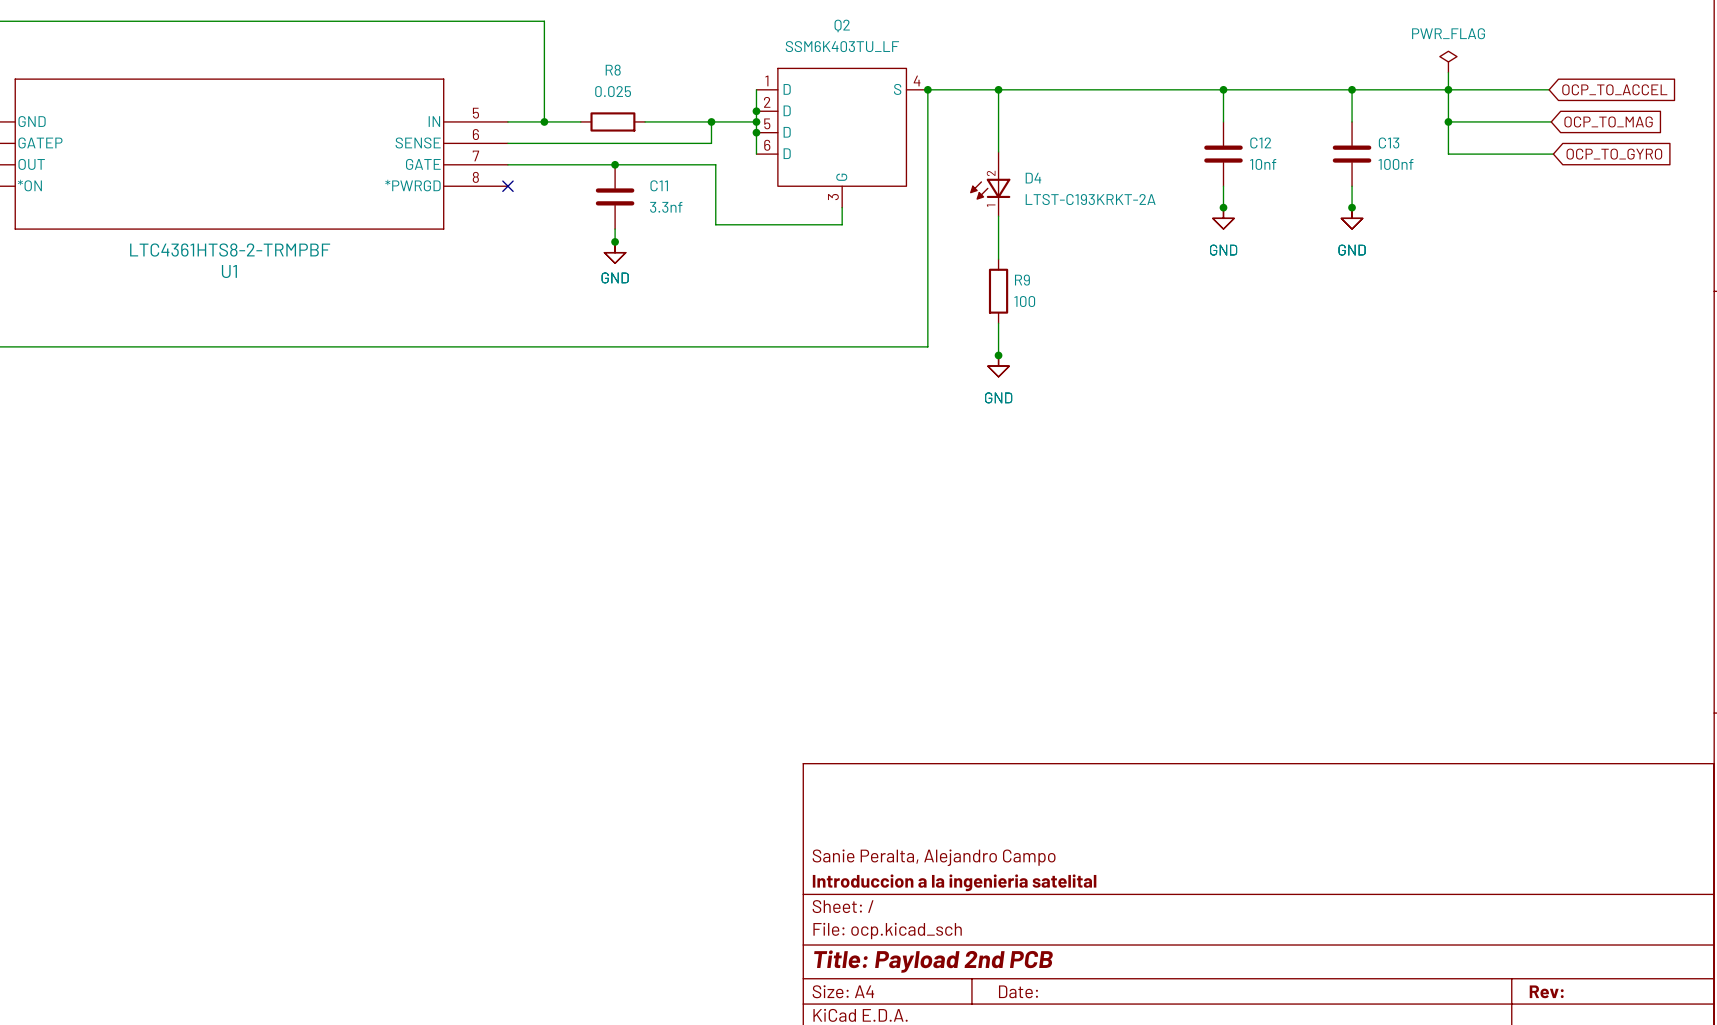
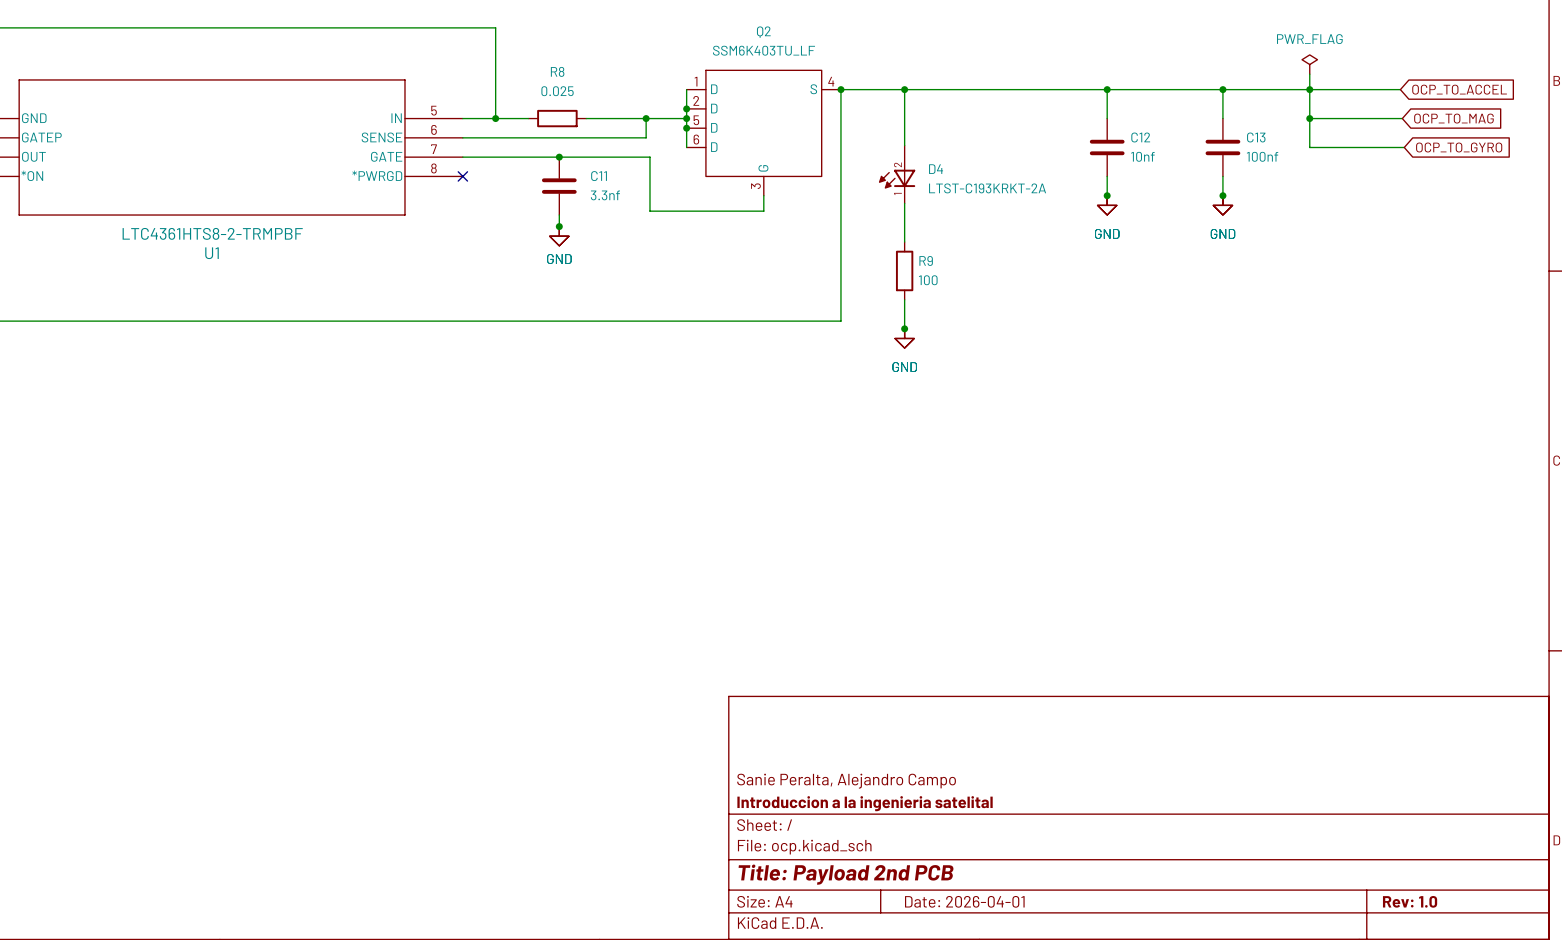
title block: Date: (1018, 991) -> Date: 2026-04-01 (964, 901)
title block: Rev: (1546, 991) -> Rev: 1.0 (1410, 901)

